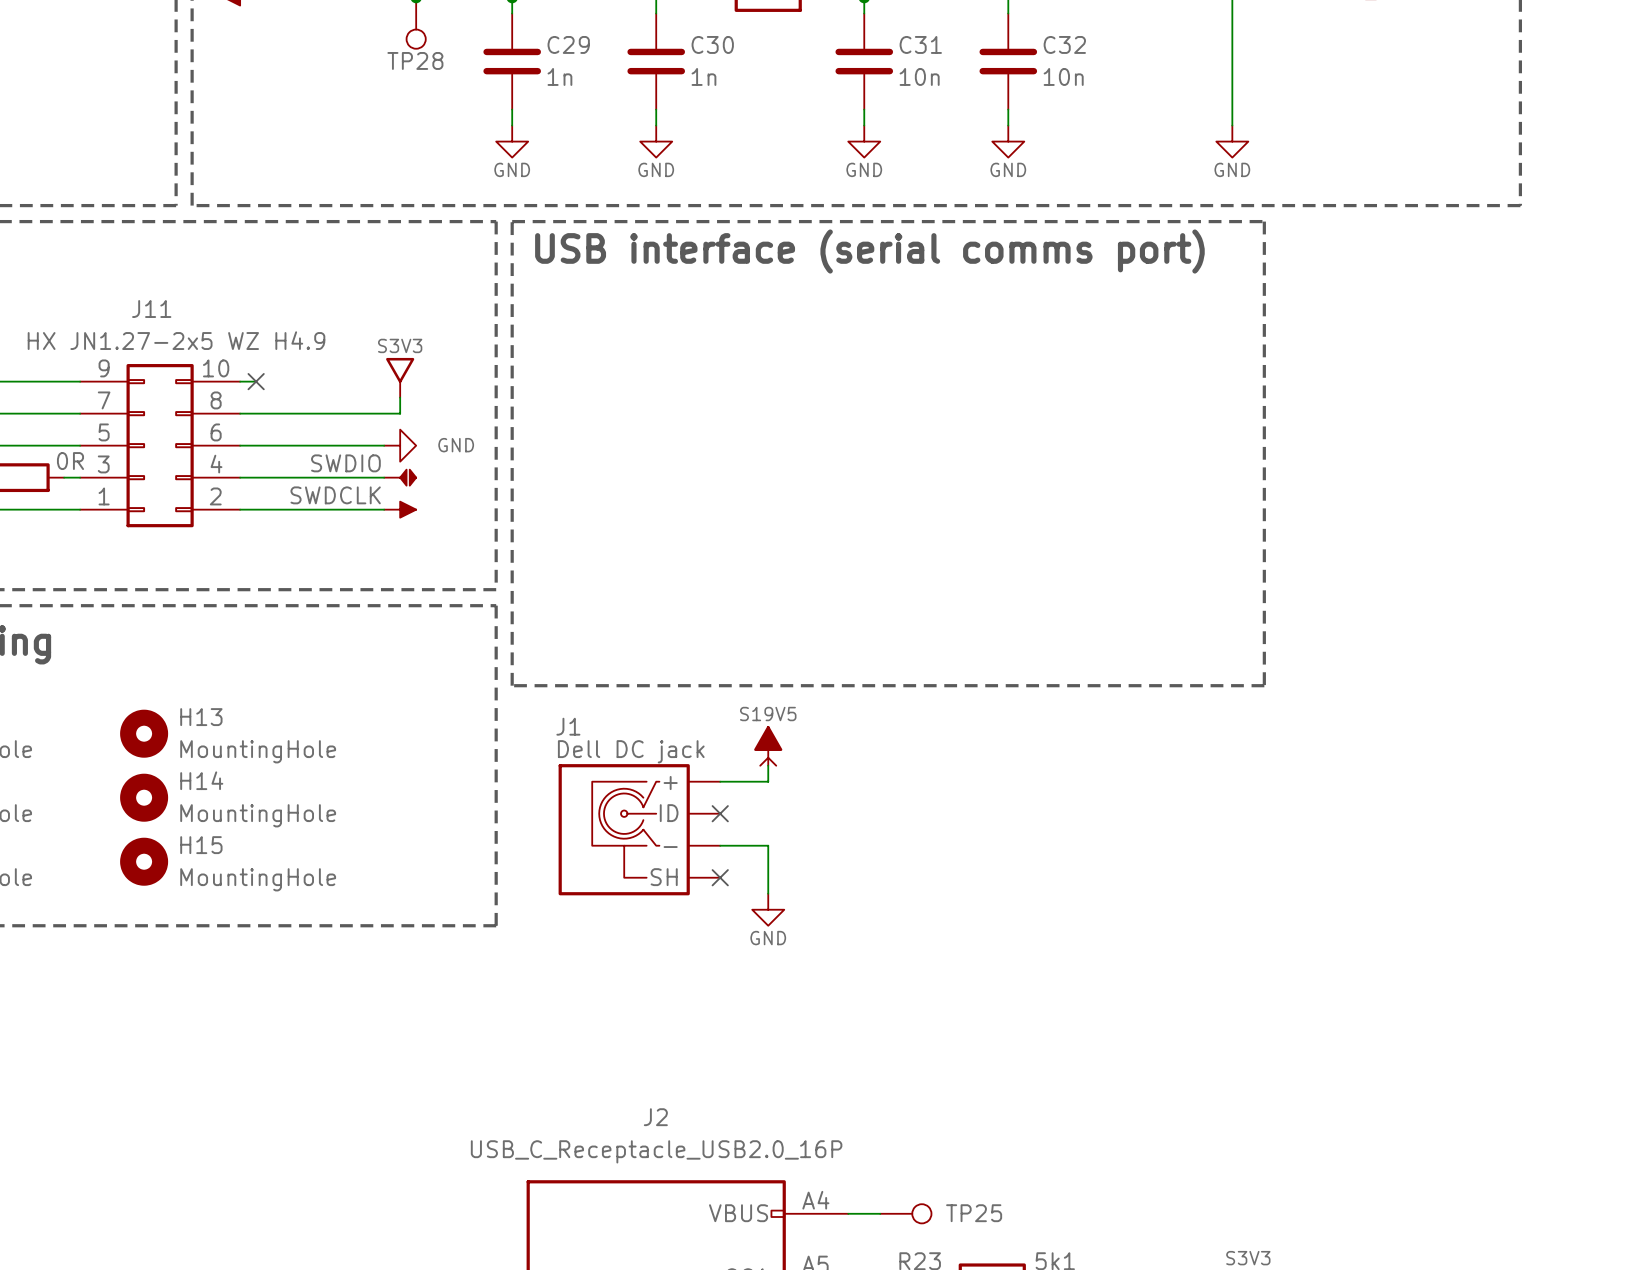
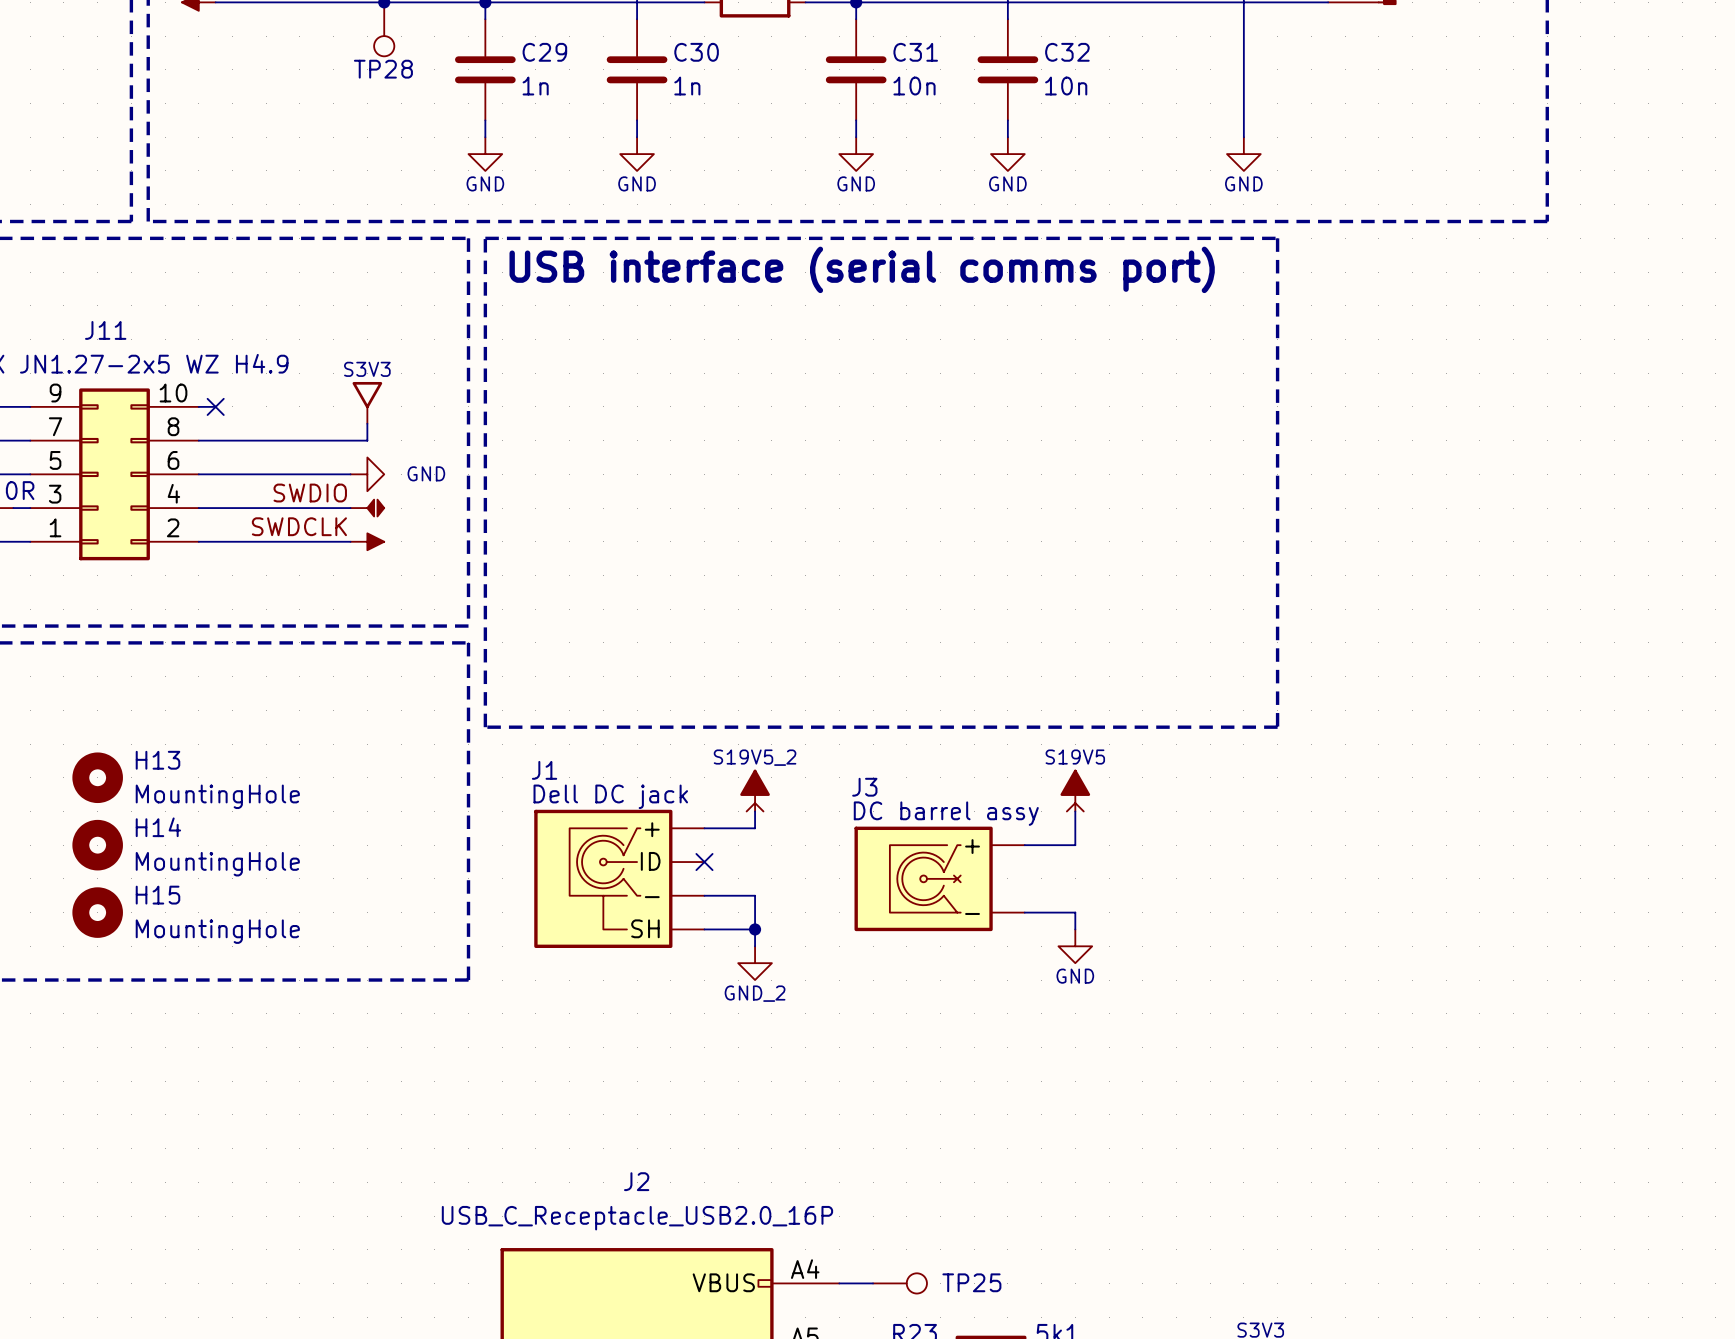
power symbol: S19V5 (768, 745) -> S19V5_2 (755, 790)
power symbol: none -> S19V5 (1075, 790)
wire: none -> (1075, 811) (1075, 845) (1024, 845)
J3: none -> DC barrel assy (939, 878)
wire: none -> (1024, 912) (1075, 912) (1075, 929)
wire: none -> (704, 929) (755, 929)
no-connect mark: (720, 877) -> none
junction: none -> (755, 929)
power symbol: none -> GND (1075, 946)
power symbol: GND (768, 909) -> GND_2 (755, 963)

